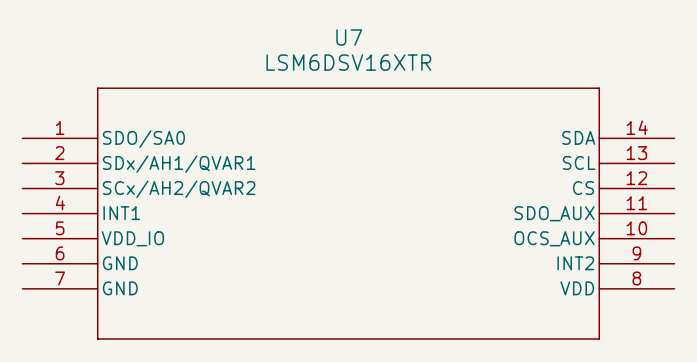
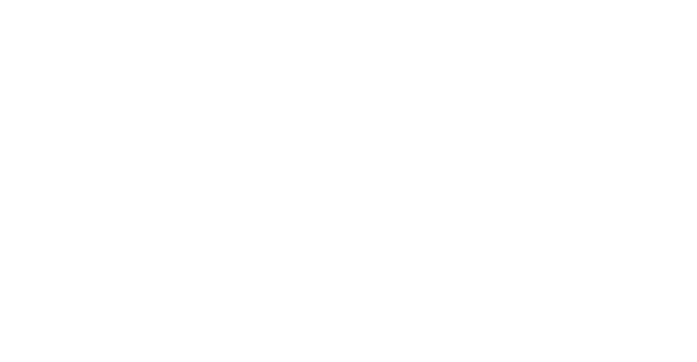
U7: LSM6DSV16XTR (348, 213) -> none

